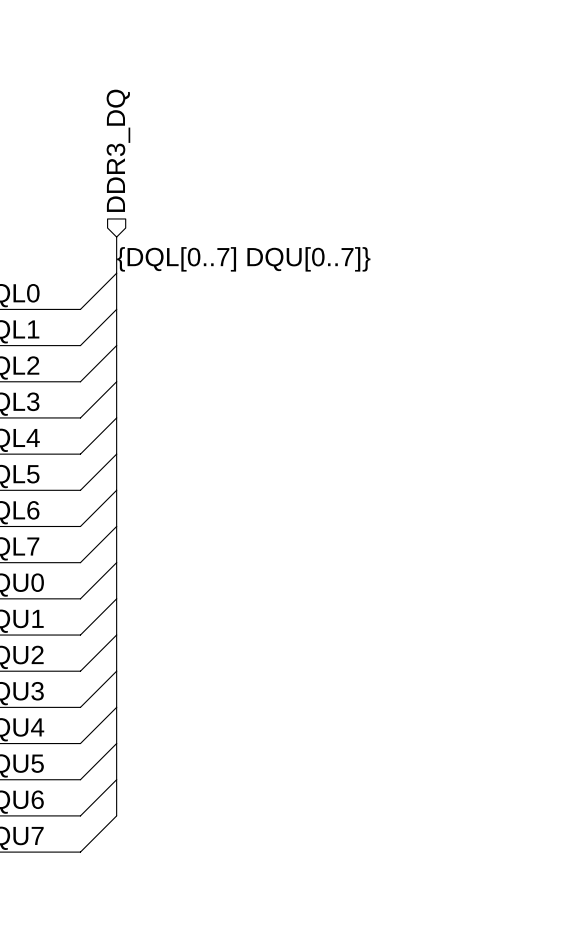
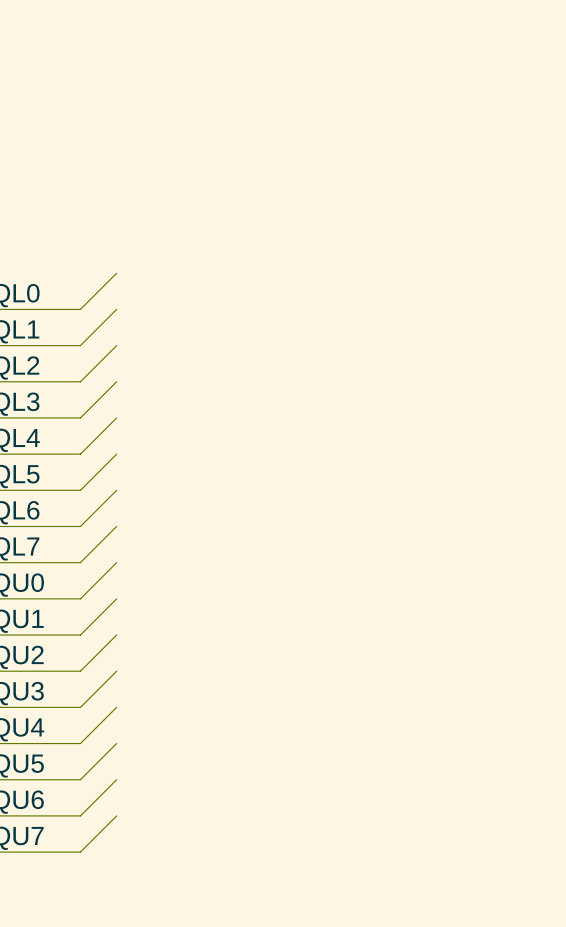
hierarchical label: DDR3_DQ (118, 150) -> none
bus: (116, 237) (116, 815) -> none
label: {DQL[0..7] DQU[0..7]} (243, 259) -> none

